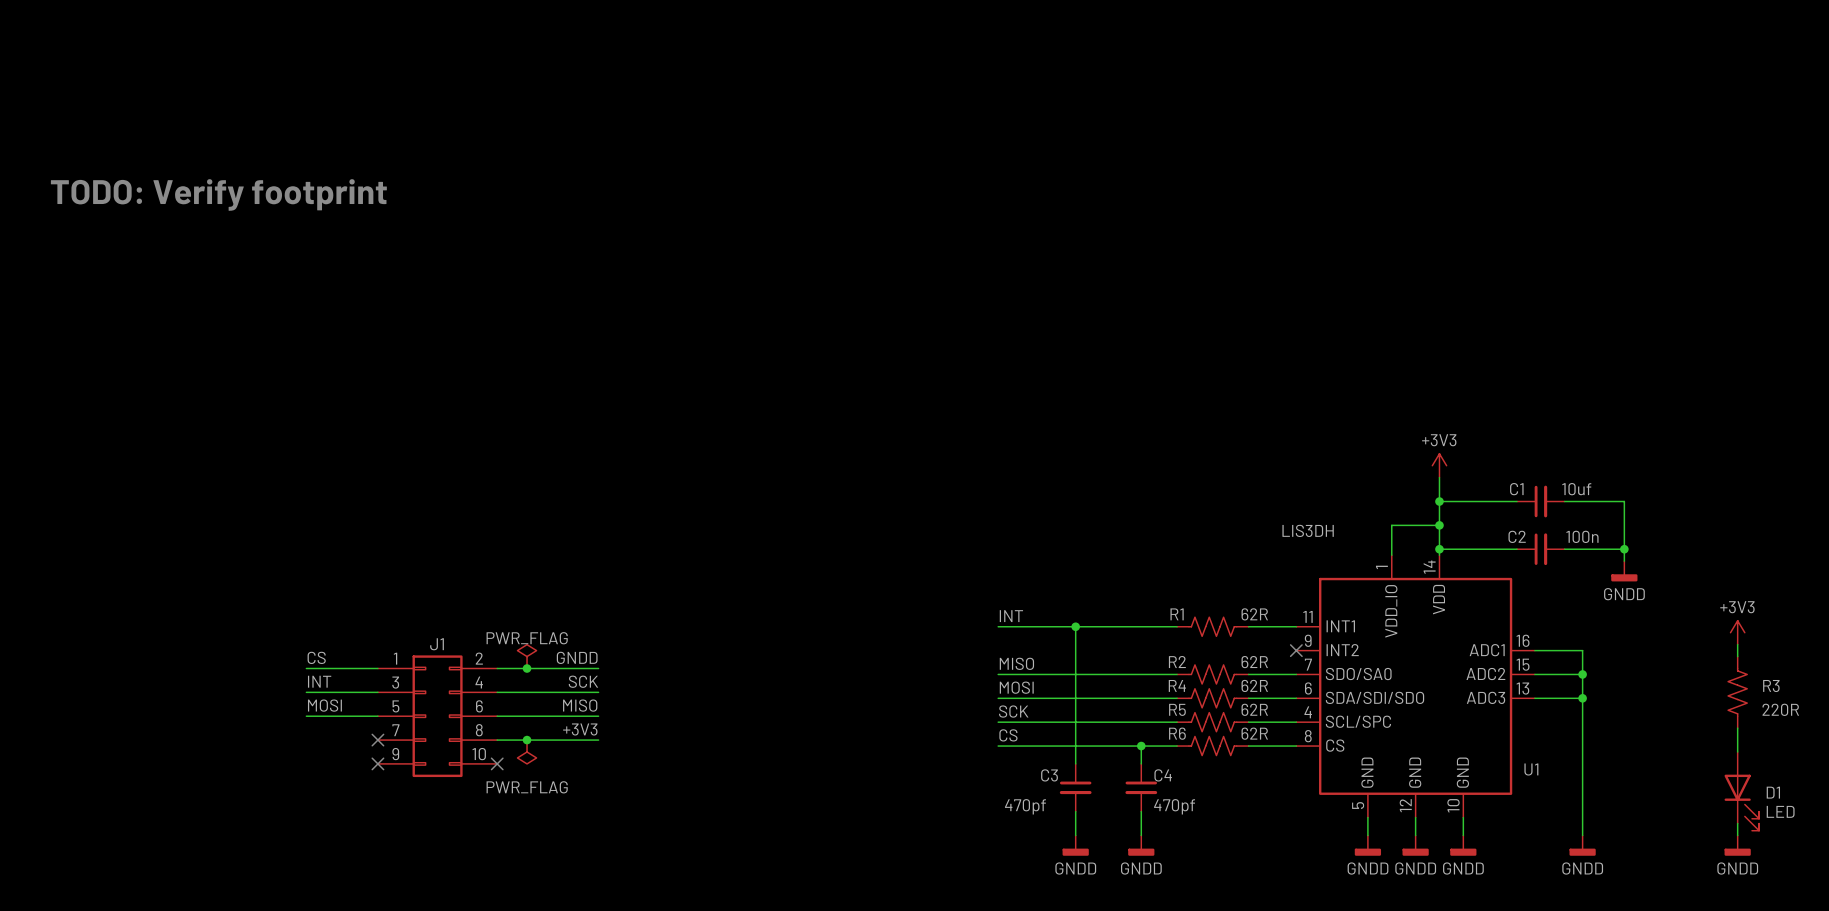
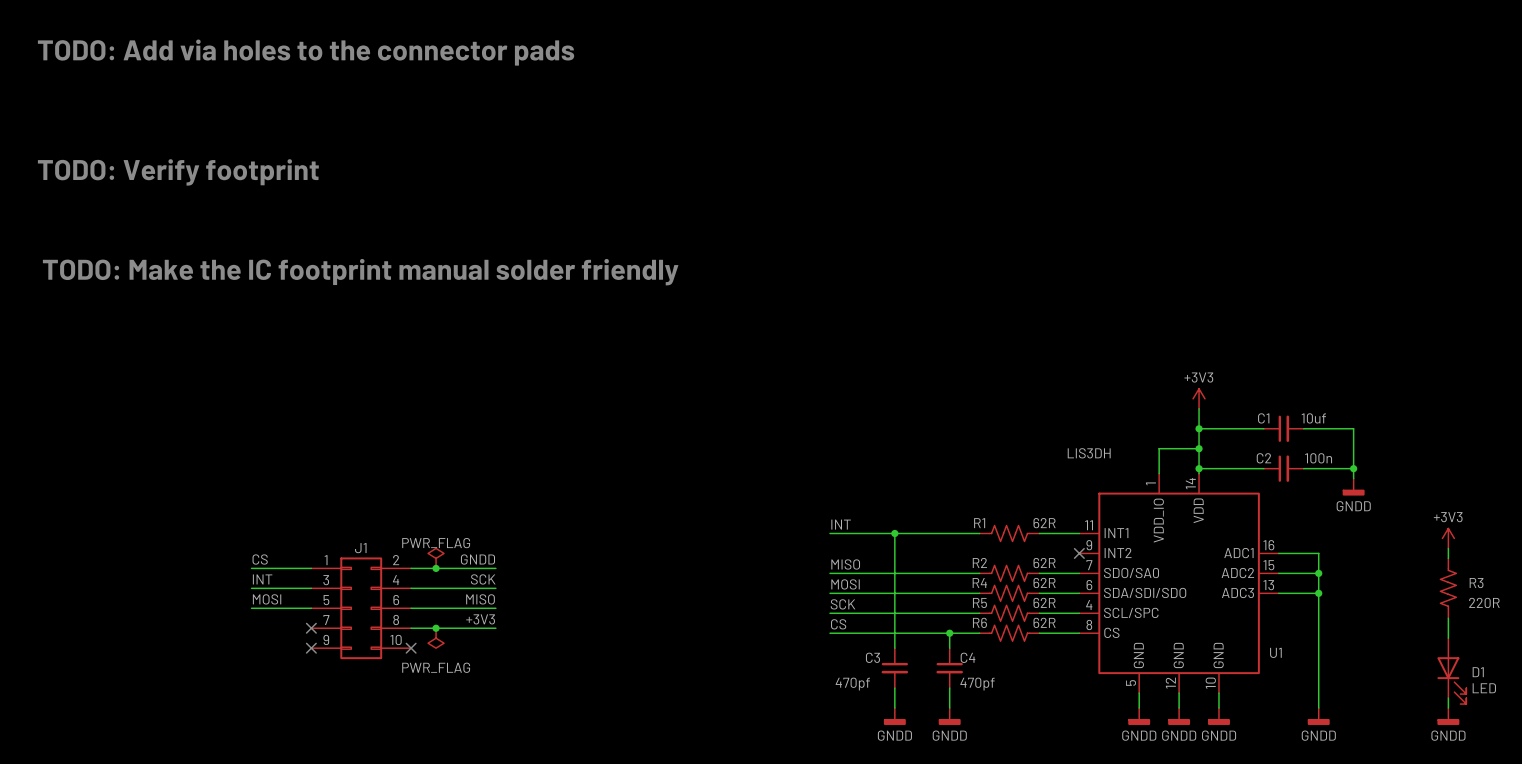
text: none -> TODO: Add via holes to the connector pads (306, 52)
text: none -> TODO: Make the IC footprint manual solder friendly (360, 272)

